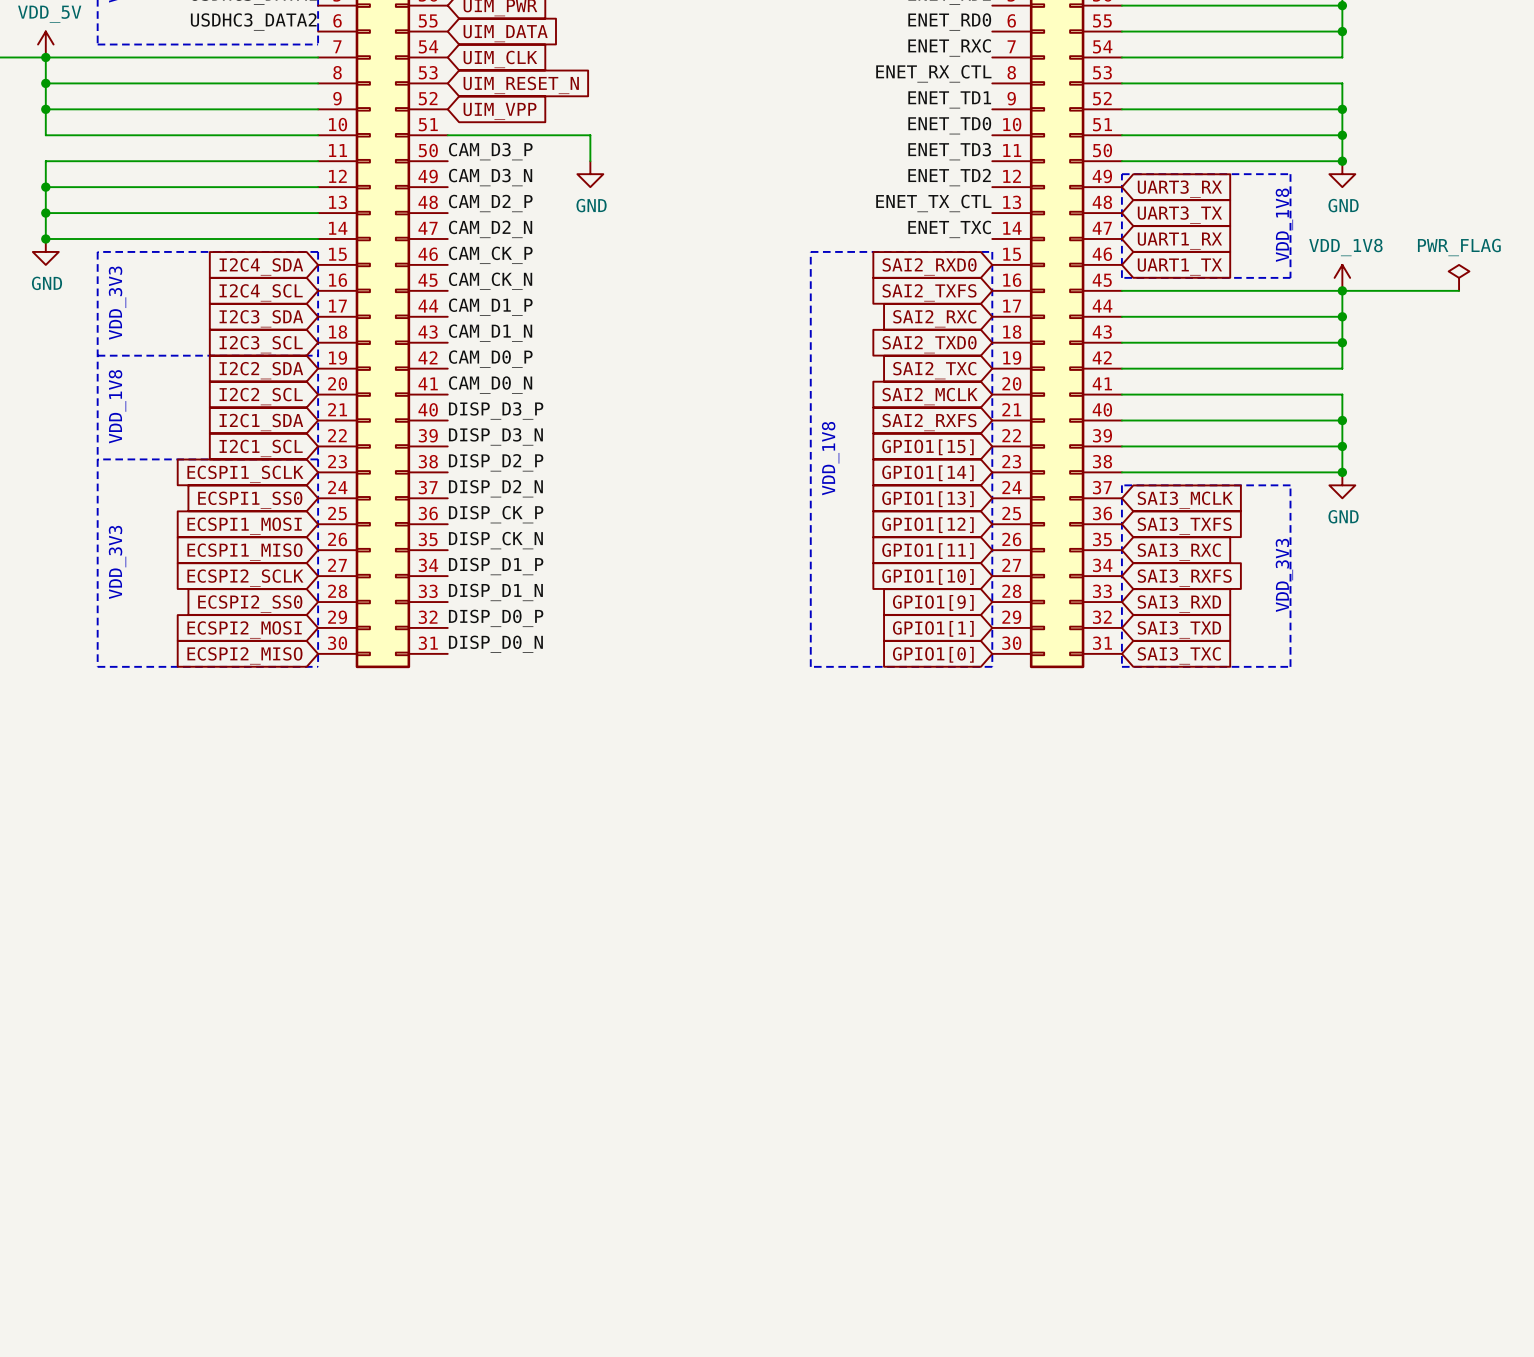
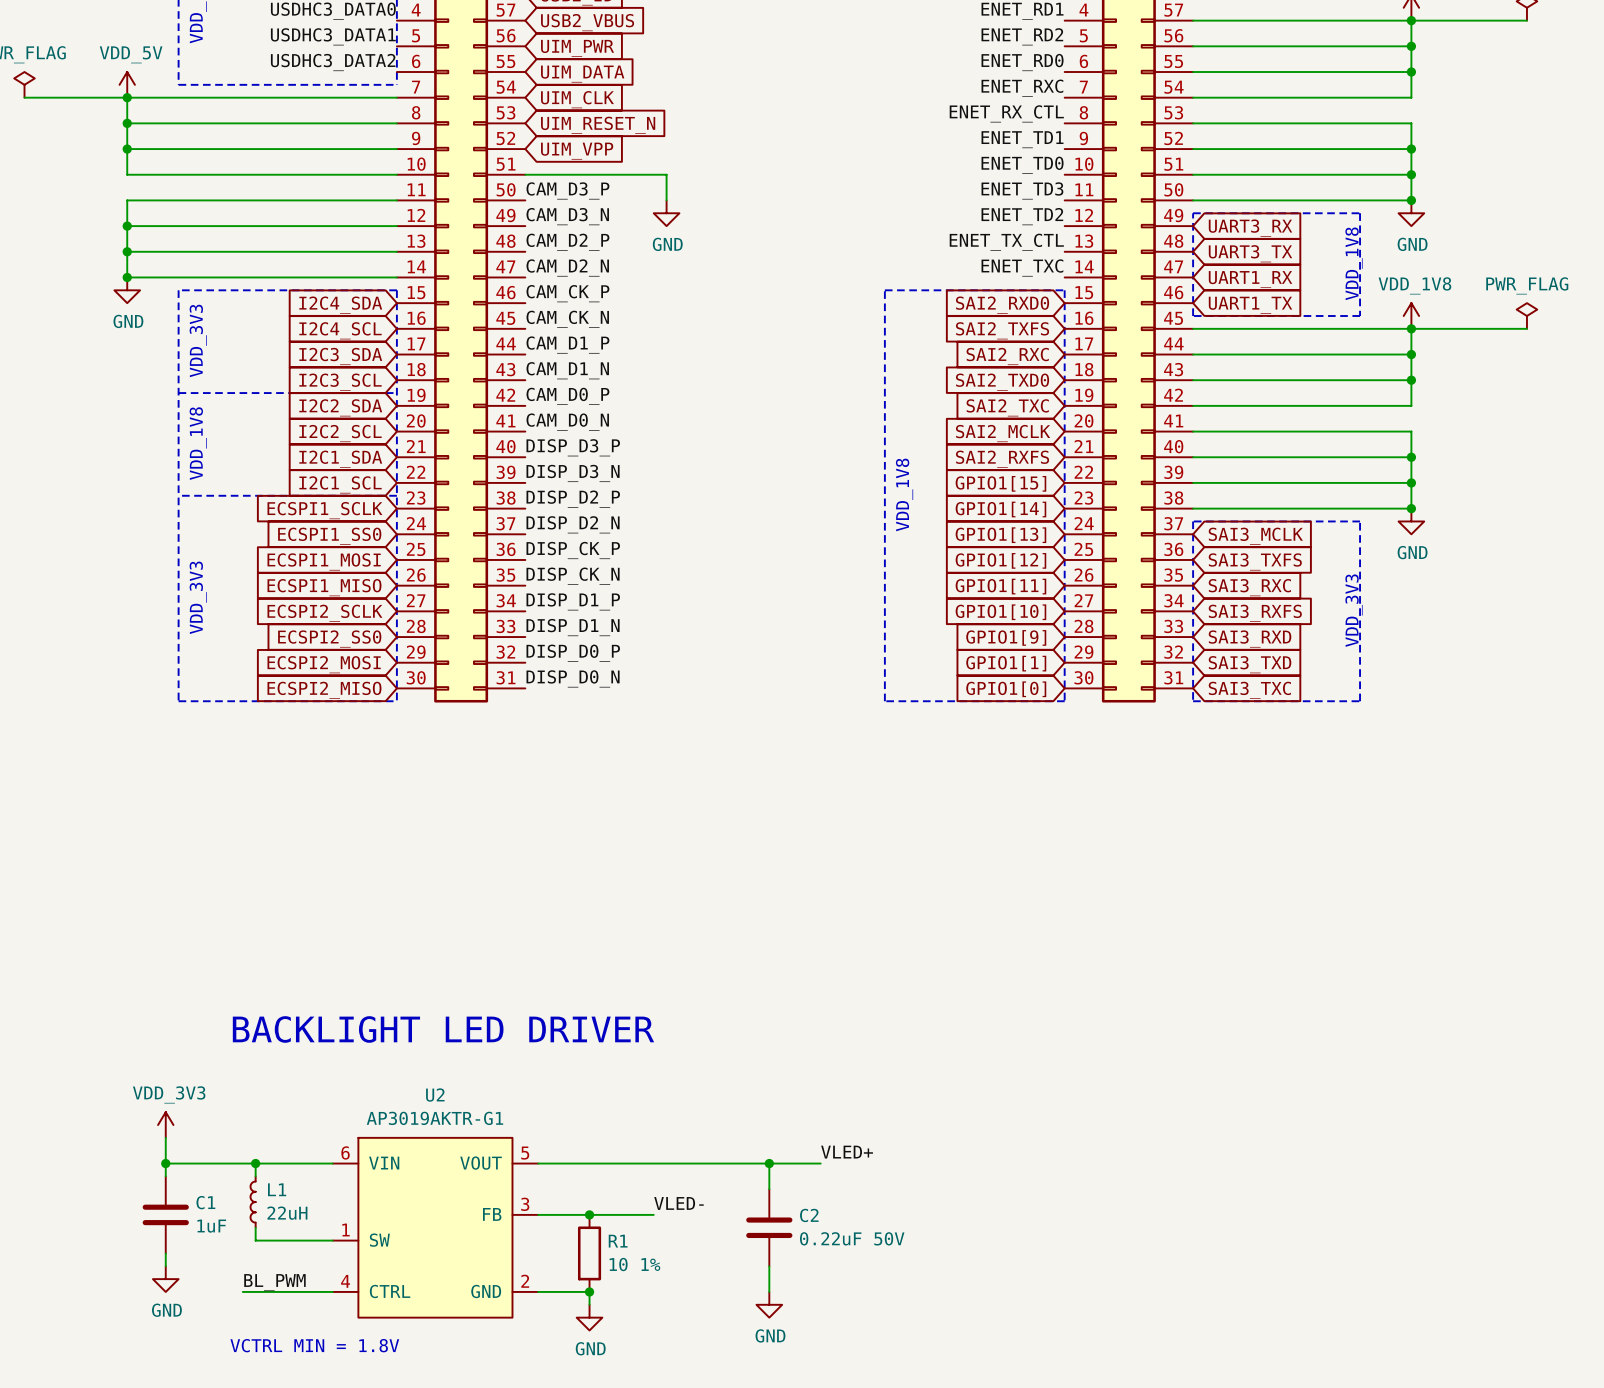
text: none -> BACKLIGHT LED DRIVER (443, 1029)
power symbol: none -> VDD_3V3 (165, 1125)
wire: none -> (165, 1137) (165, 1176)
label: none -> VLED+ (847, 1152)
wire: none -> (165, 1163) (332, 1163)
junction: none -> (165, 1163)
wire: none -> (255, 1163) (255, 1176)
junction: none -> (255, 1163)
wire: none -> (538, 1163) (820, 1163)
wire: none -> (769, 1163) (769, 1189)
junction: none -> (769, 1163)
L1: none -> 22uH (253, 1202)
label: none -> VLED- (678, 1203)
C1: none -> 1uF (165, 1214)
wire: none -> (538, 1214) (653, 1214)
junction: none -> (589, 1214)
wire: none -> (255, 1227) (255, 1240) (332, 1240)
U2: none -> AP3019AKTR-G1 (435, 1227)
C2: none -> 0.22uF 50V (769, 1227)
wire: none -> (165, 1253) (165, 1266)
R1: none -> 10 1% (589, 1253)
wire: none -> (769, 1266) (769, 1291)
power symbol: none -> GND (165, 1279)
label: none -> BL_PWM (274, 1282)
wire: none -> (242, 1291) (332, 1291)
wire: none -> (538, 1291) (589, 1291) (589, 1304)
junction: none -> (589, 1291)
power symbol: none -> GND (769, 1304)
power symbol: none -> GND (589, 1317)
text: none -> VCTRL MIN = 1.8V (314, 1345)

